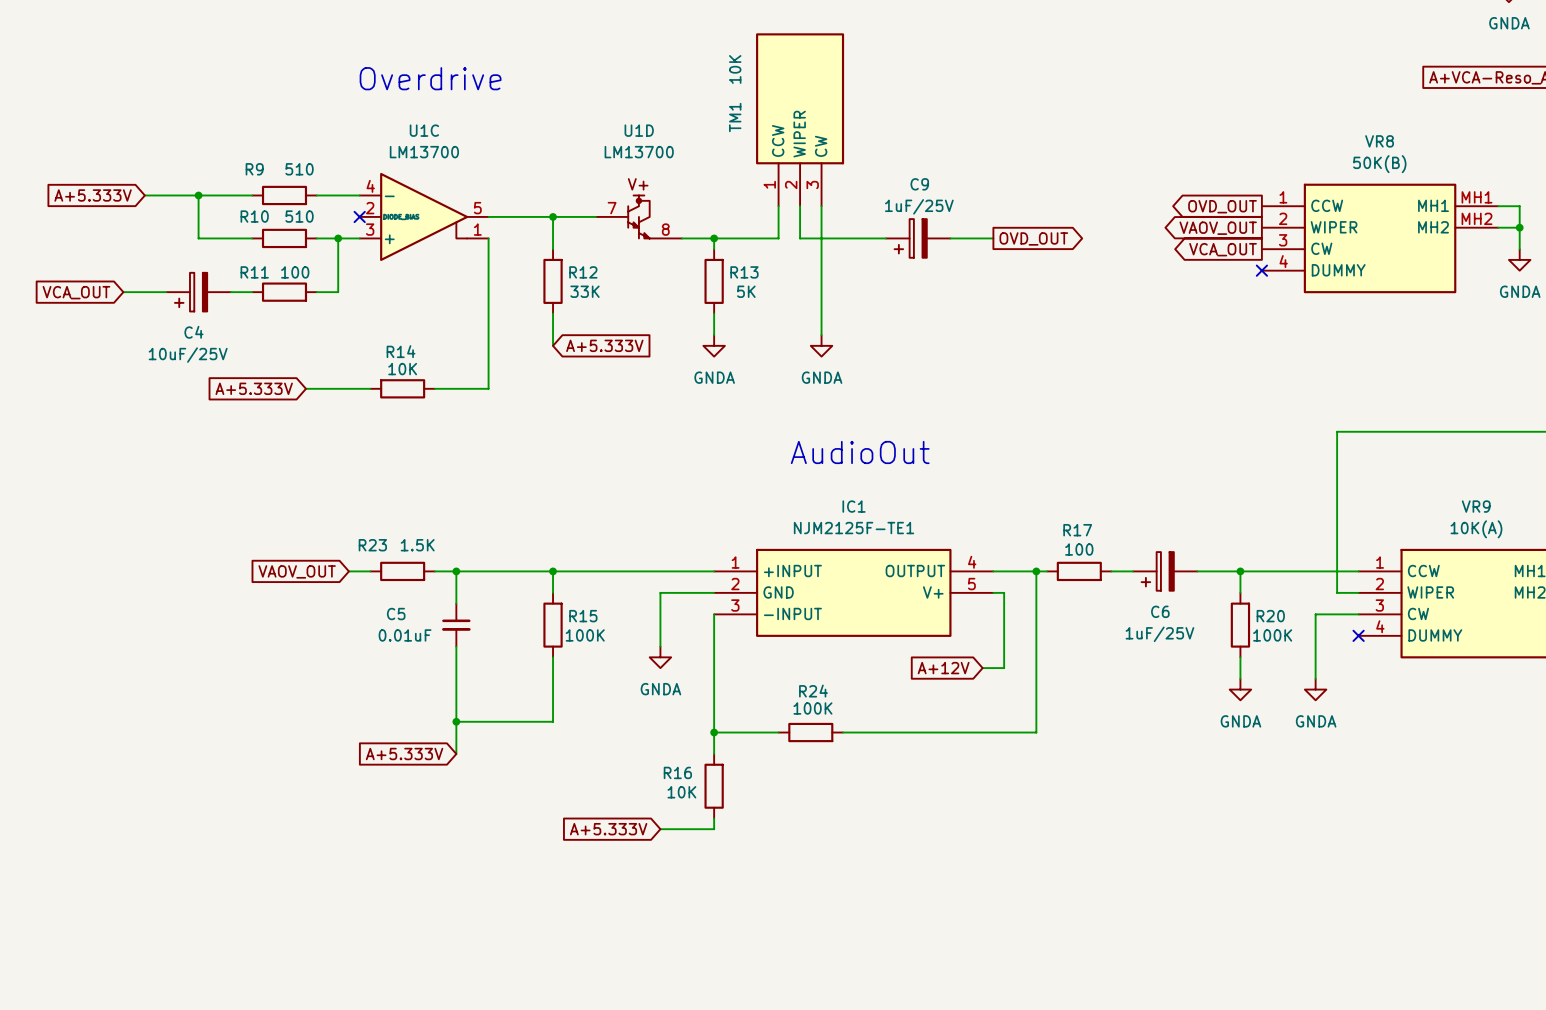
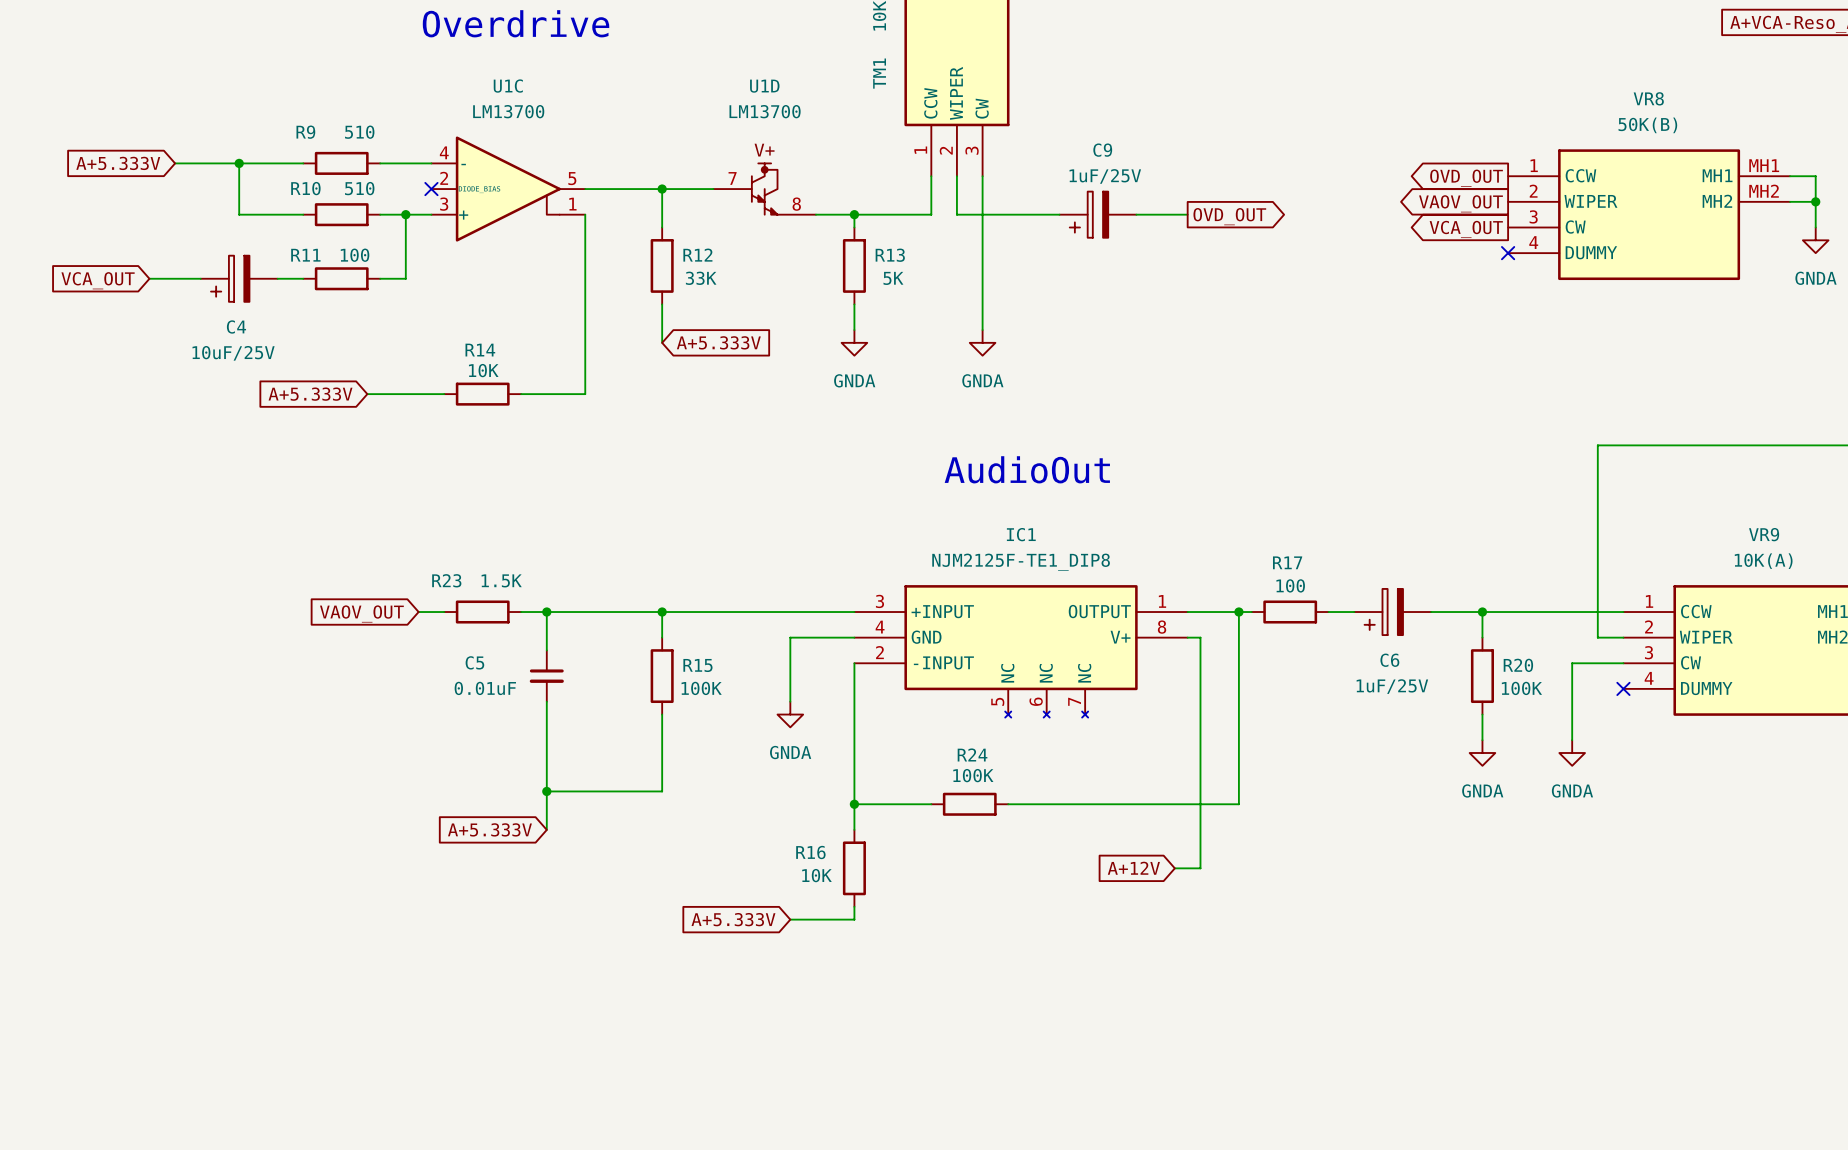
IC1 value: NJM2125F-TE1 (854, 528) -> NJM2125F-TE1_DIP8 (1021, 562)
IC1 symbol: [714, 548, 994, 637] -> [854, 585, 1188, 718]
global label position: A+12V (943, 668) -> A+12V (1133, 868)
wire: (982, 668) (1004, 668) -> (1174, 868) (1200, 868) (1200, 727)

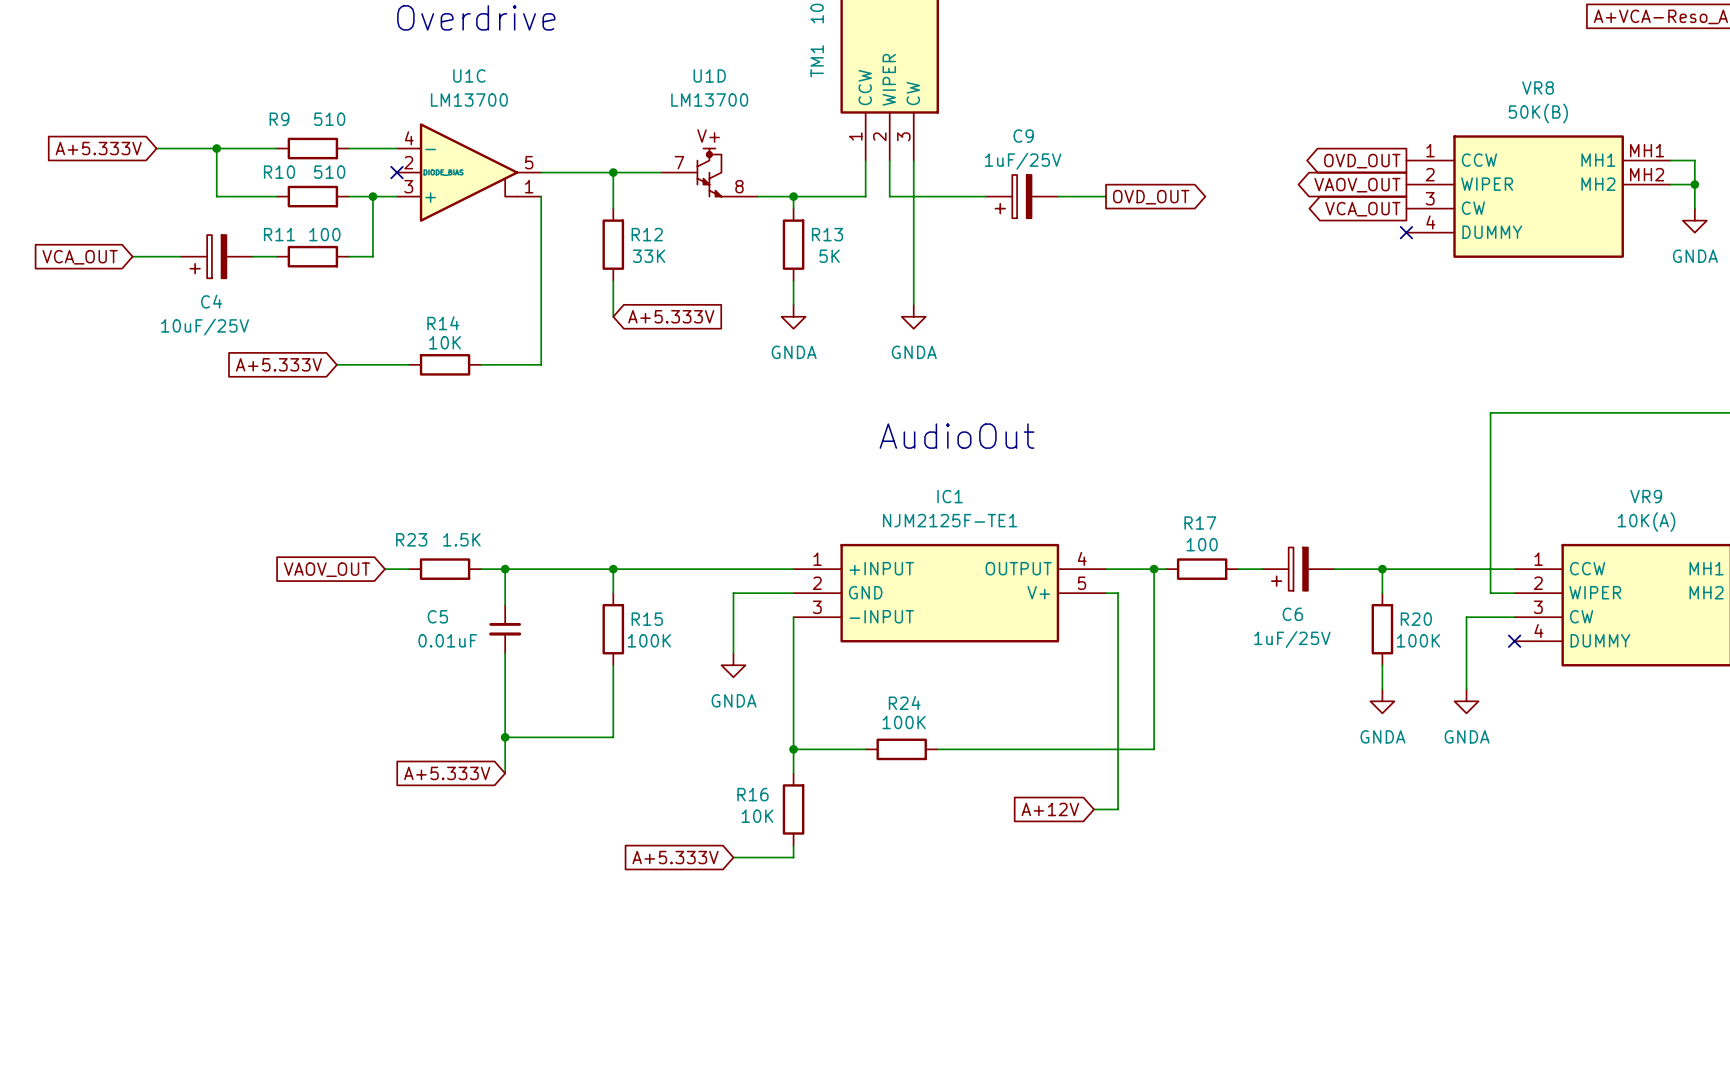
IC1 value: NJM2125F-TE1_DIP8 (1021, 562) -> NJM2125F-TE1 (950, 520)
IC1 symbol: [854, 585, 1188, 718] -> [793, 543, 1107, 643]

